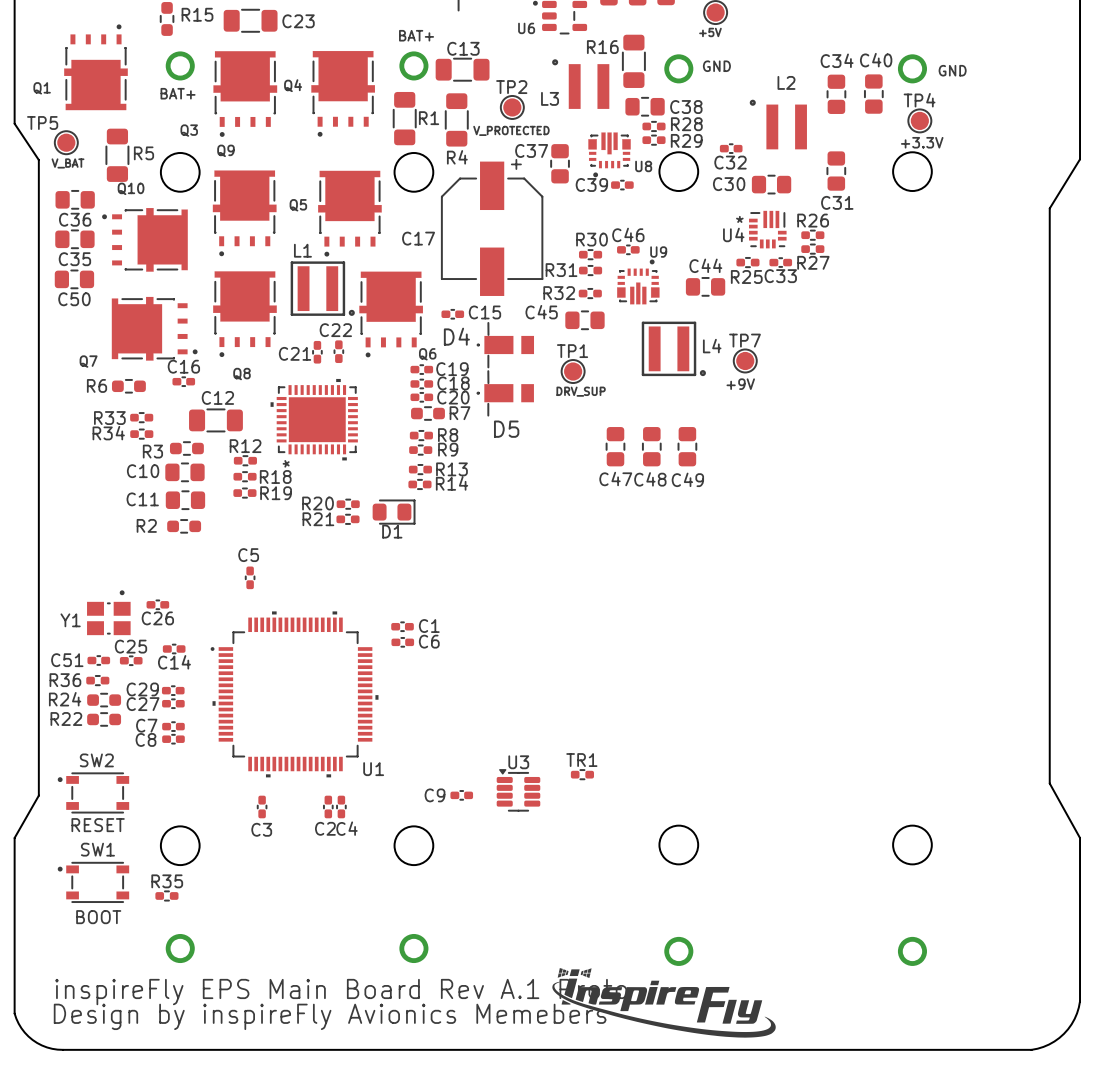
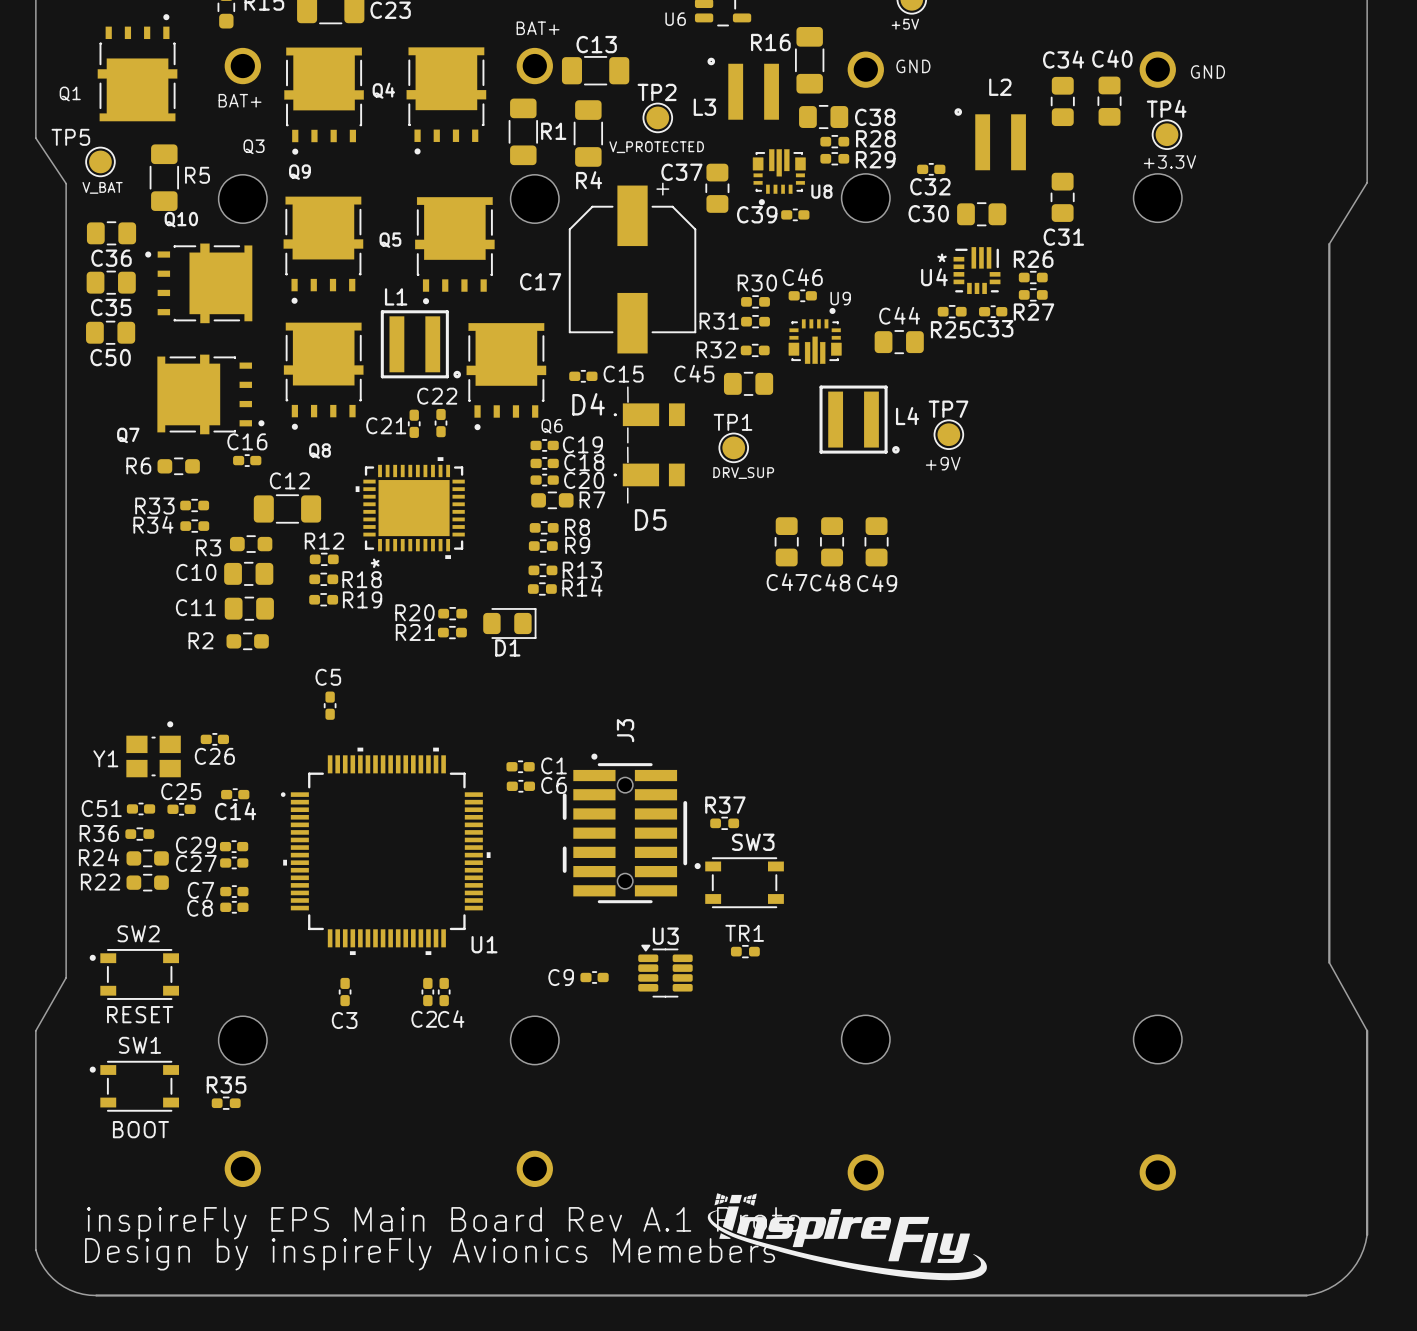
R37: none -> (724, 823)
J3: none -> (624, 828)
SW3: none -> (739, 882)

